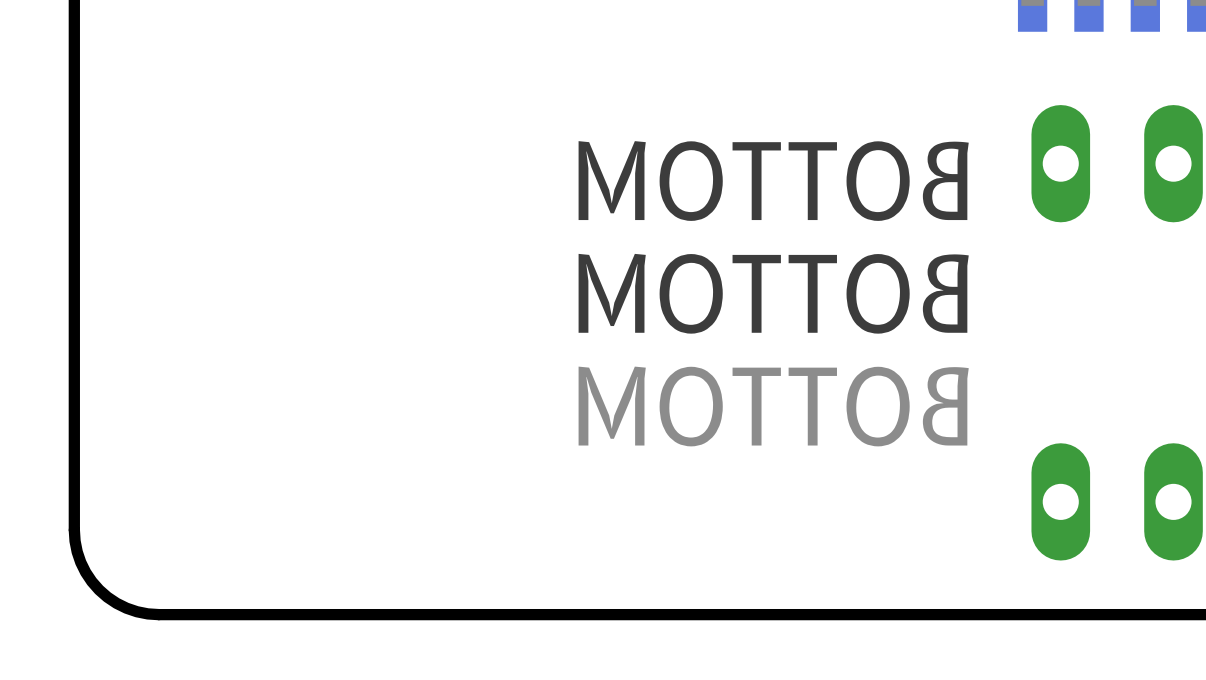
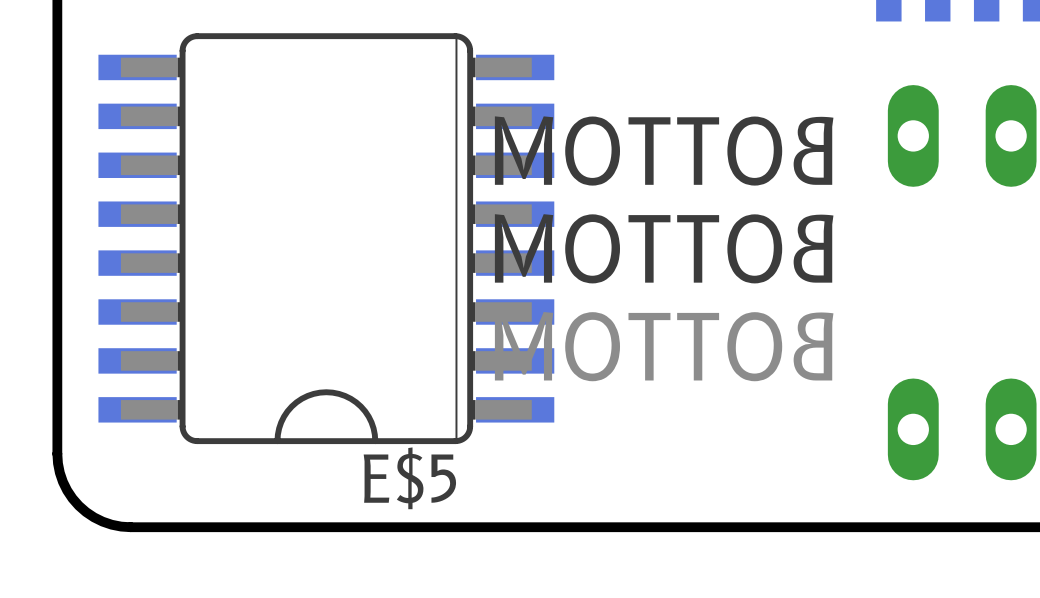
E$5: none -> (326, 238)

